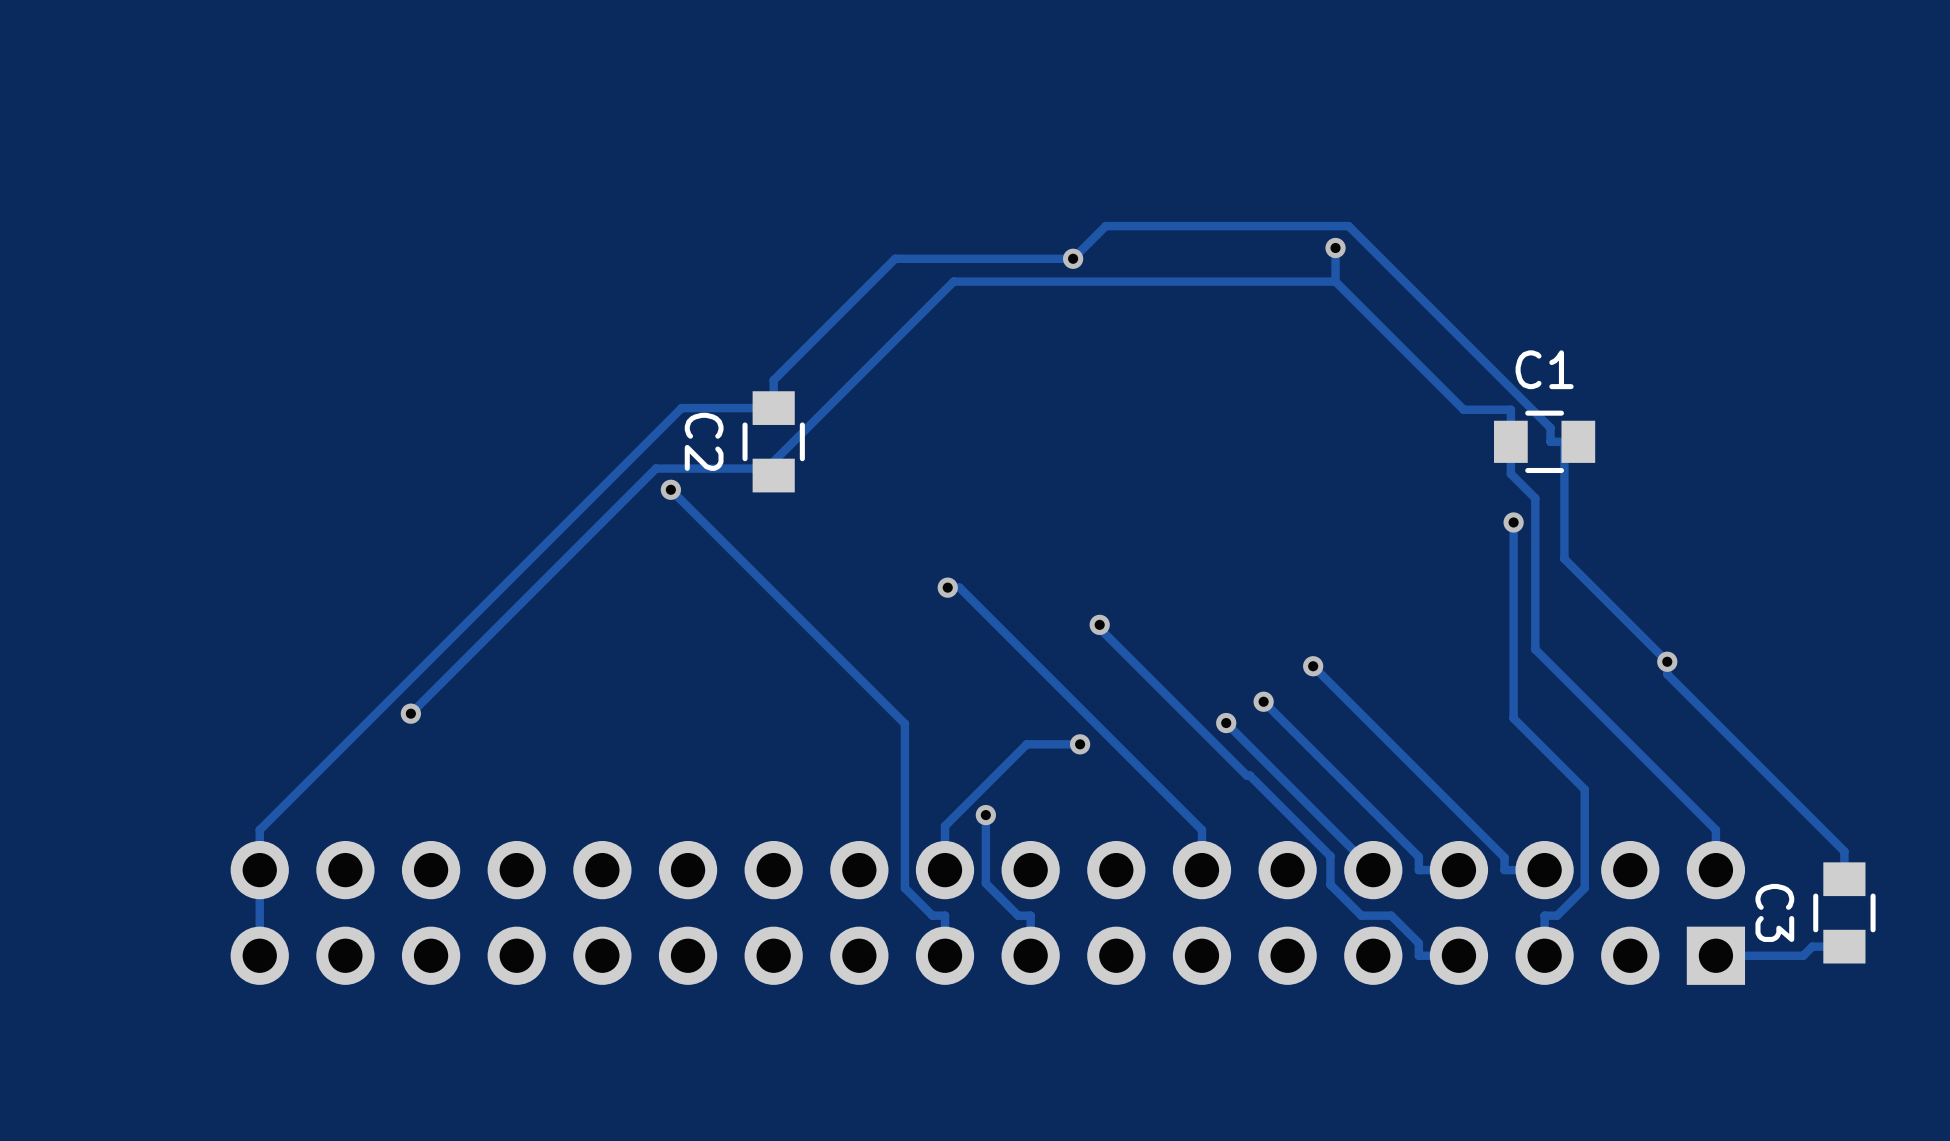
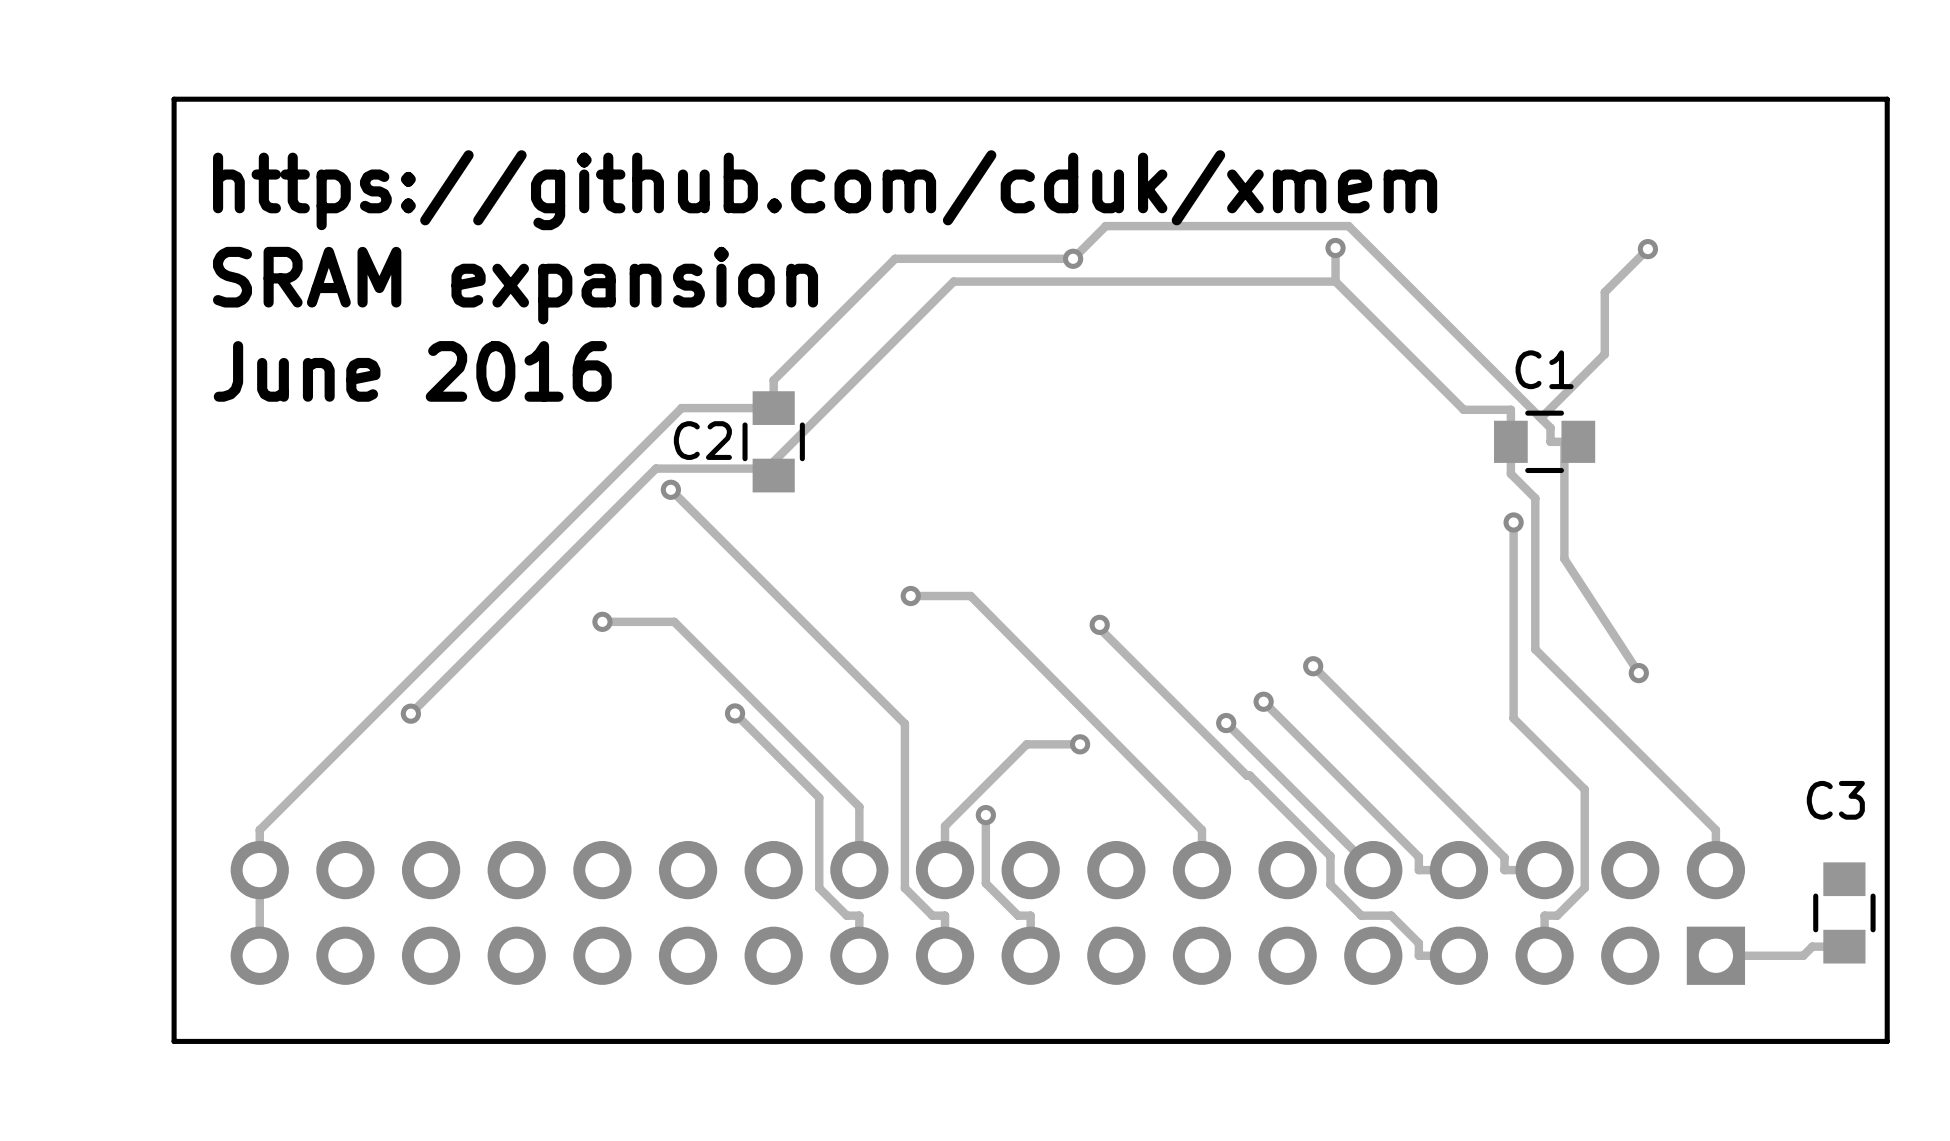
board edge: none -> (1887, 99) (1887, 1041) (174, 1041) (174, 99) (1887, 99)
text: none -> https://github.com/cduk/xmem (825, 190)
track: none -> (1647, 249) (1604, 292) (1604, 354) (1540, 418)
via: none -> (1647, 249)
text: none -> SRAM expansion (515, 285)
text: none -> June 2016 (412, 371)
C2 name rotation: 0° (704, 441) -> 90° counterclockwise (702, 440)
track: (1564, 558) (1667, 661) (1667, 674) (1844, 851) (1844, 879) -> (1564, 558) (1638, 673)
track: (947, 587) (959, 587) (1201, 830) -> (910, 596) (970, 596) (1201, 830)
via position: (947, 587) -> (910, 596)
track: none -> (602, 621) (674, 621) (859, 806) (859, 870)
via: none -> (602, 621)
via position: (1667, 661) -> (1638, 673)
track: none -> (735, 713) (819, 797) (819, 888) (846, 915) (859, 915) (859, 955)
via: none -> (735, 713)
C3 name rotation: 0° (1774, 912) -> 90° counterclockwise (1835, 800)
C3 name position: C3 (1774, 912) -> C3 (1835, 800)

